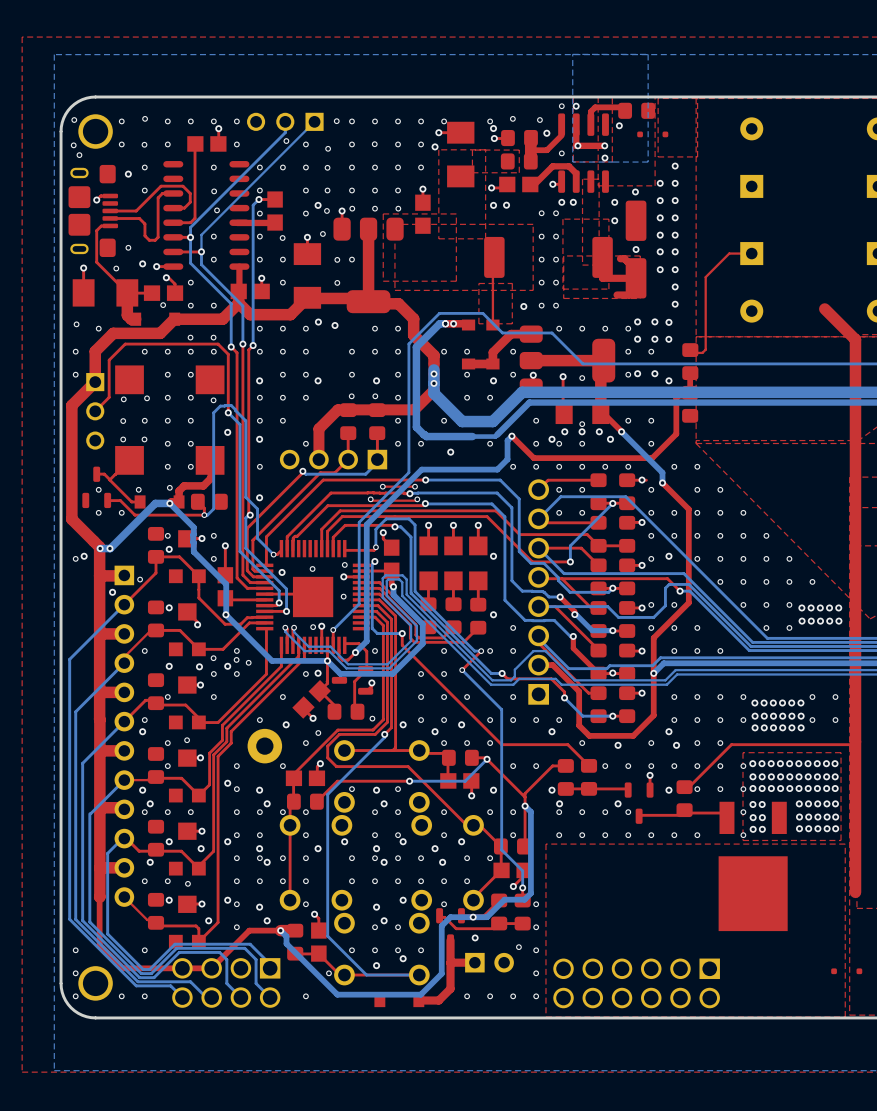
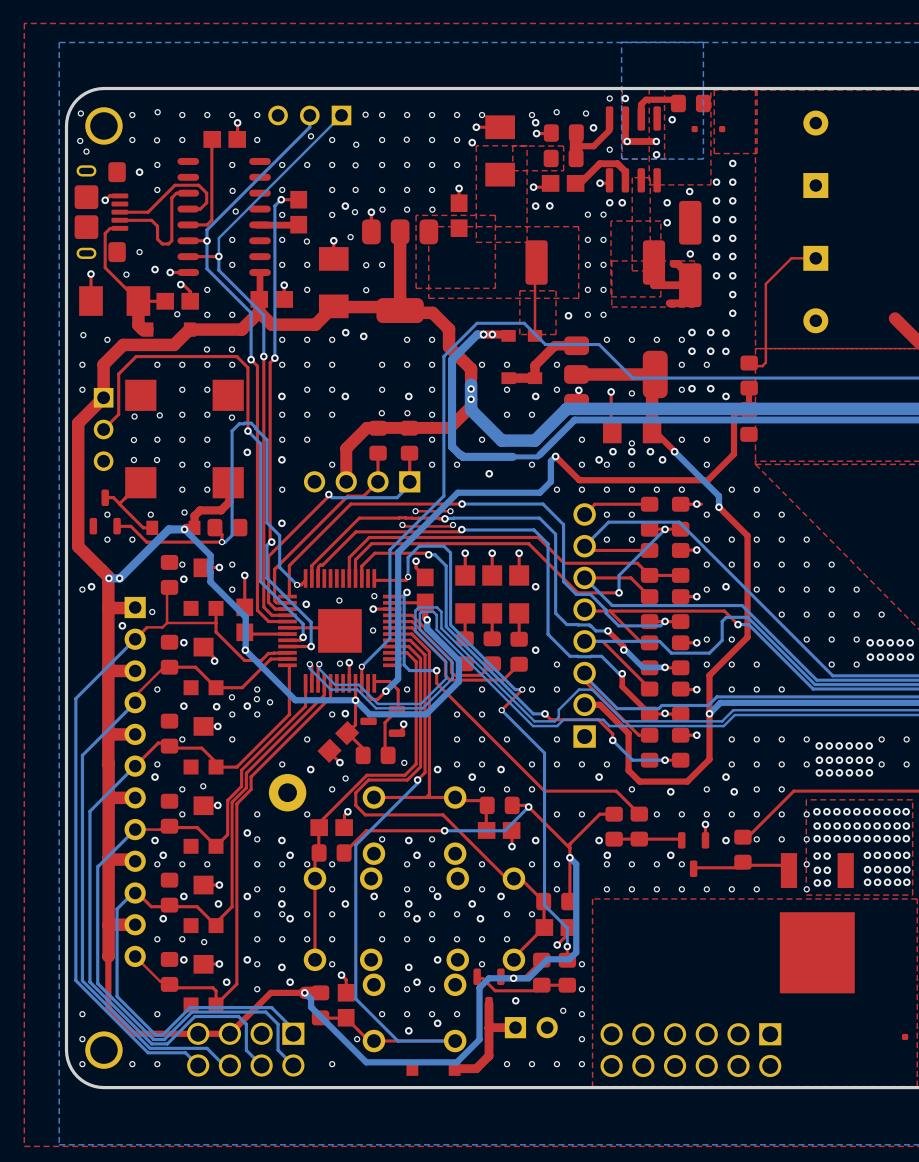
top track: none -> (167, 584) (167, 622)
top track: (198, 576) (179, 556) (156, 556) (156, 573) (135, 593) -> (167, 622) (162, 627) (147, 627)
top track: none -> (216, 622) (167, 622)

